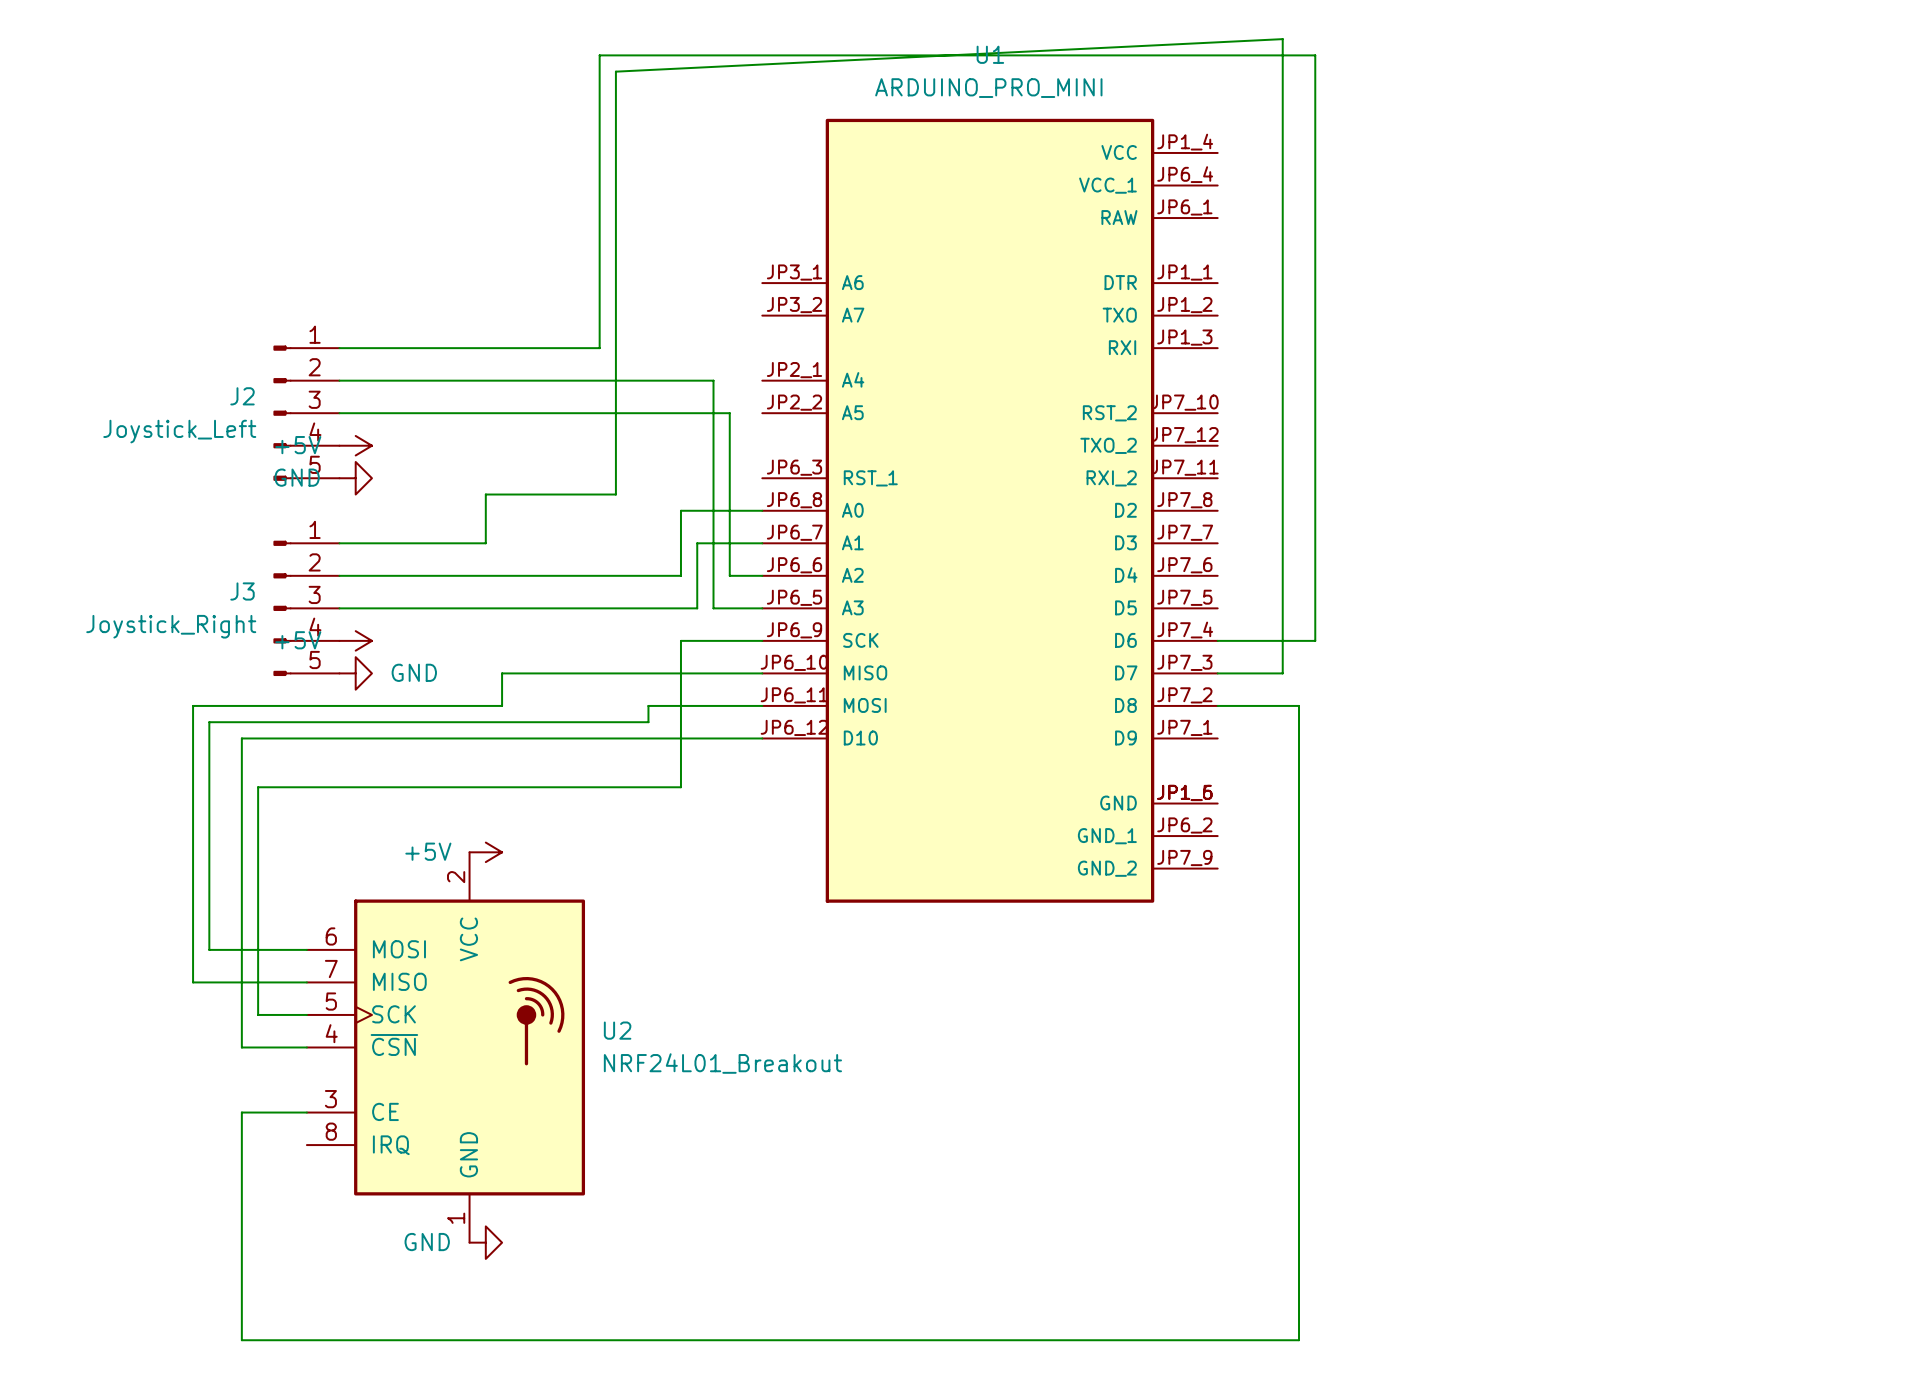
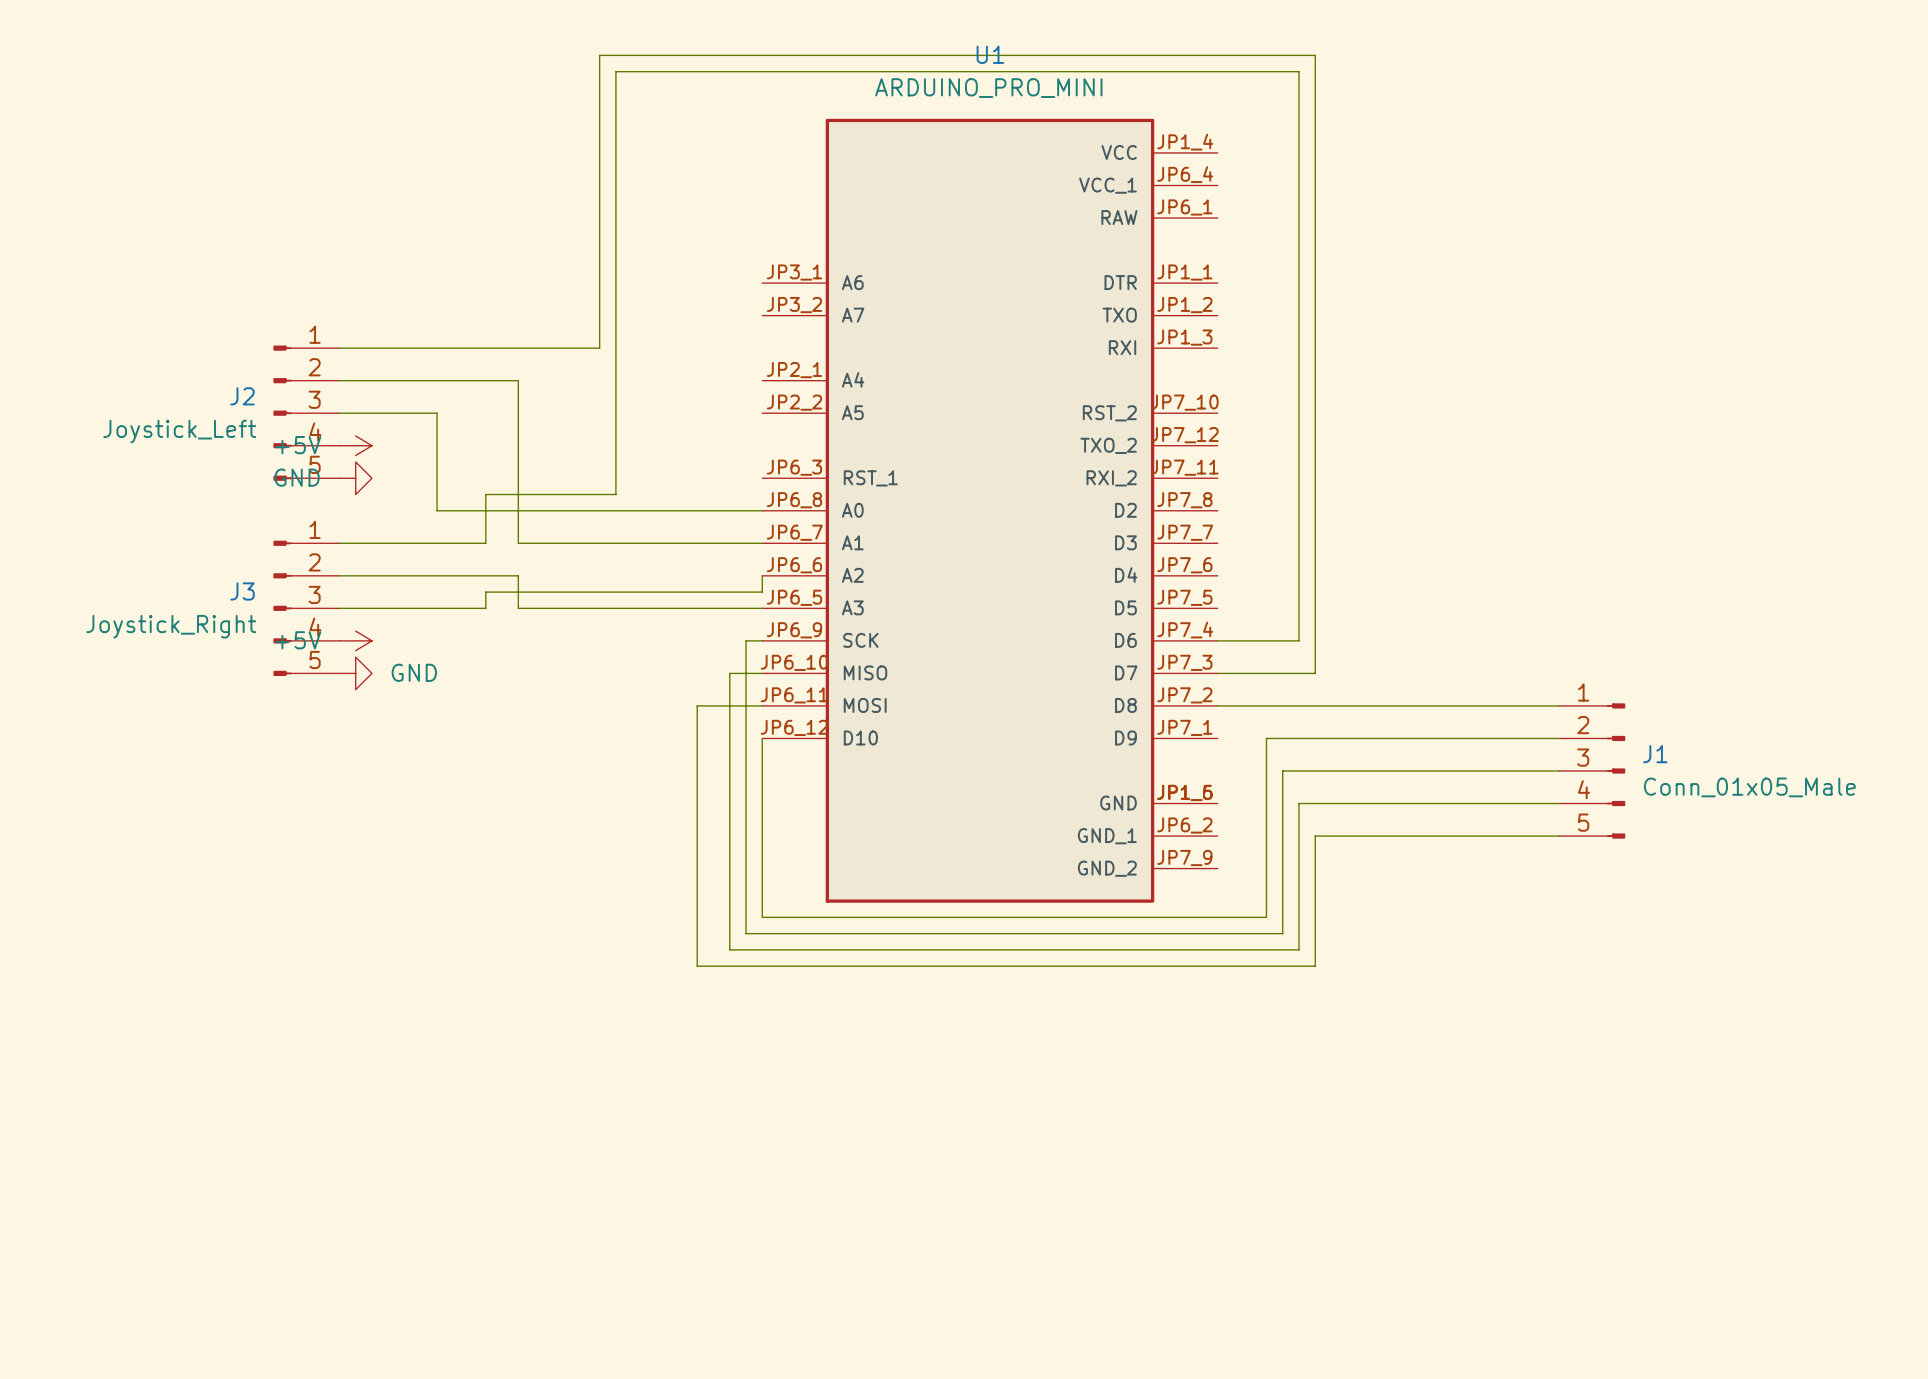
wire: (615, 71) (1282, 39) (1282, 673) -> (615, 71) (1299, 71) (1299, 640)
wire: (518, 380) (713, 380) (713, 608) -> (518, 380) (518, 543) (697, 543)
wire: (437, 413) (729, 413) (729, 575) (762, 575) -> (437, 413) (437, 510) (680, 510)
wire: (680, 510) (680, 575) (518, 575) -> none
wire: (697, 543) (697, 608) -> (713, 608) (697, 608)
wire: none -> (762, 575) (762, 592) (485, 592) (485, 608)
wire: (485, 608) (518, 608) -> (518, 575) (518, 608)
wire: (746, 640) (680, 640) (680, 787) (258, 787) (258, 1014) (306, 1014) -> (746, 640) (746, 933) (1282, 933) (1282, 771) (1559, 771)
wire: (1299, 640) (1315, 640) -> (1282, 673) (1315, 673) (1315, 640)
wire: (729, 673) (502, 673) (502, 705) (193, 705) (193, 982) (306, 982) -> none
wire: (697, 705) (648, 705) (648, 722) (209, 722) (209, 949) (306, 949) -> (697, 705) (697, 966) (1315, 966) (1315, 836) (1559, 836)
wire: (1299, 705) (1299, 803) -> (1299, 705) (1559, 705)
wire: (762, 738) (241, 738) (241, 1047) (306, 1047) -> (762, 738) (762, 917) (1266, 917) (1266, 738) (1559, 738)
J1: none -> Conn_01x05_Male (1592, 771)
wire: none -> (1299, 803) (1559, 803)
power symbol: +5V (485, 852) -> none
wire: (1299, 949) (1299, 1340) (241, 1340) (241, 1112) (306, 1112) -> (1299, 949) (729, 949) (729, 673)
U2: NRF24L01_Breakout (445, 1047) -> none
power symbol: GND (485, 1242) -> none

